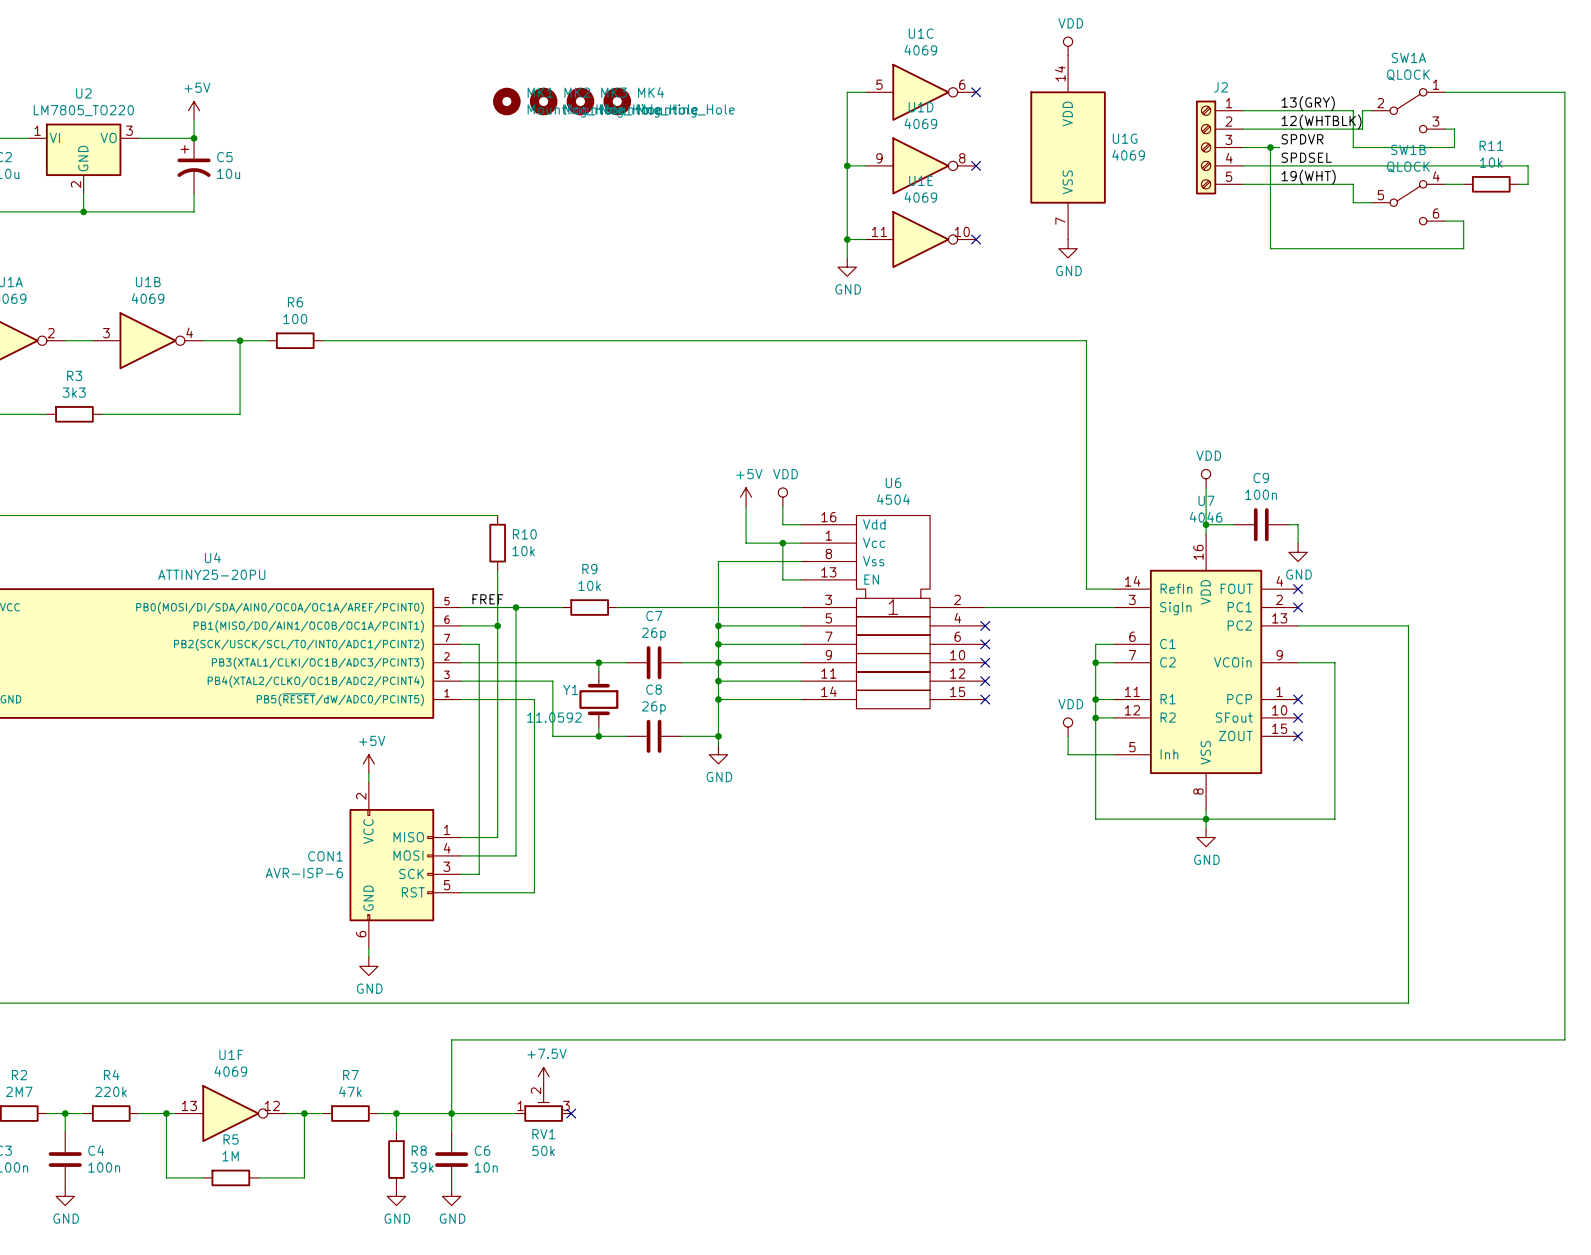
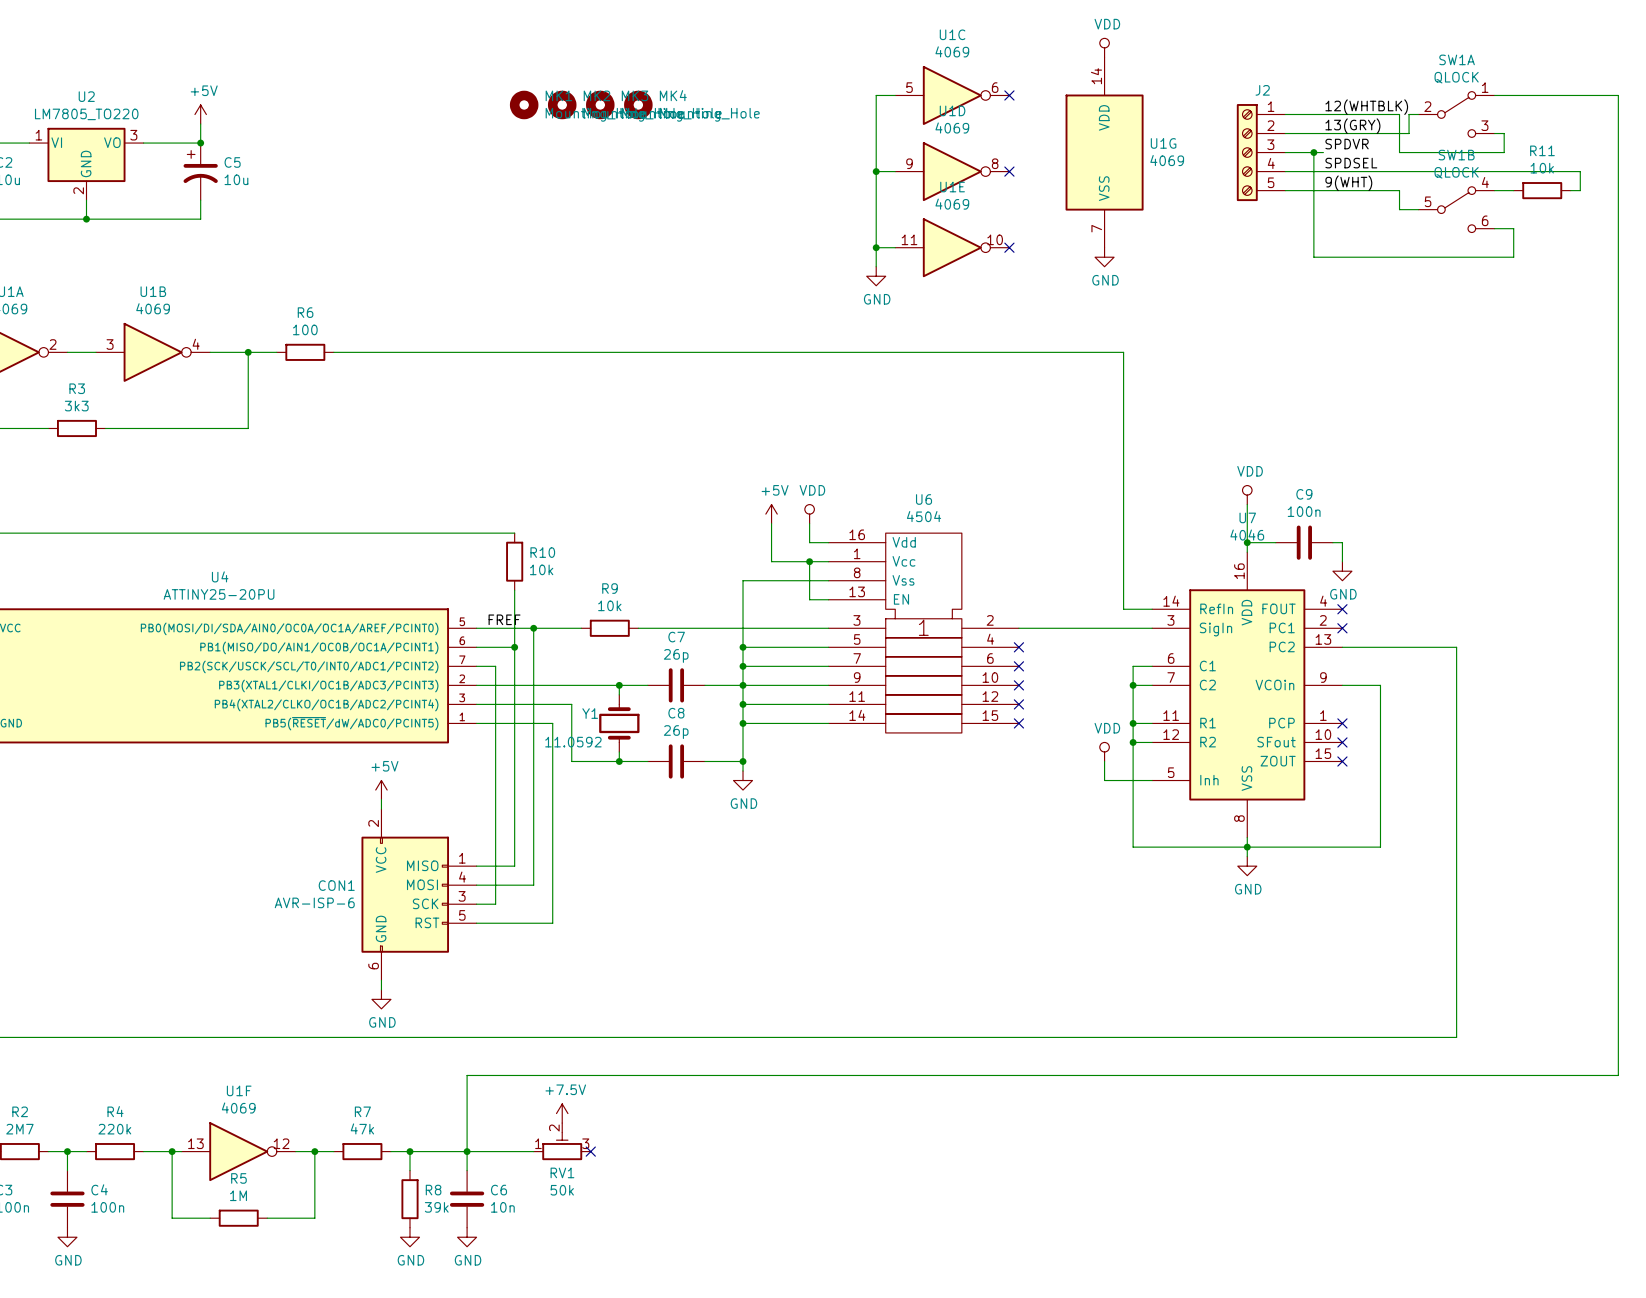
label: 13(GRY) (1308, 103) -> 12(WHTBLK) (1366, 107)
label: 12(WHTBLK) (1321, 122) -> 13(GRY) (1352, 126)
label: 19(WHT) (1308, 177) -> 9(WHT) (1348, 183)

